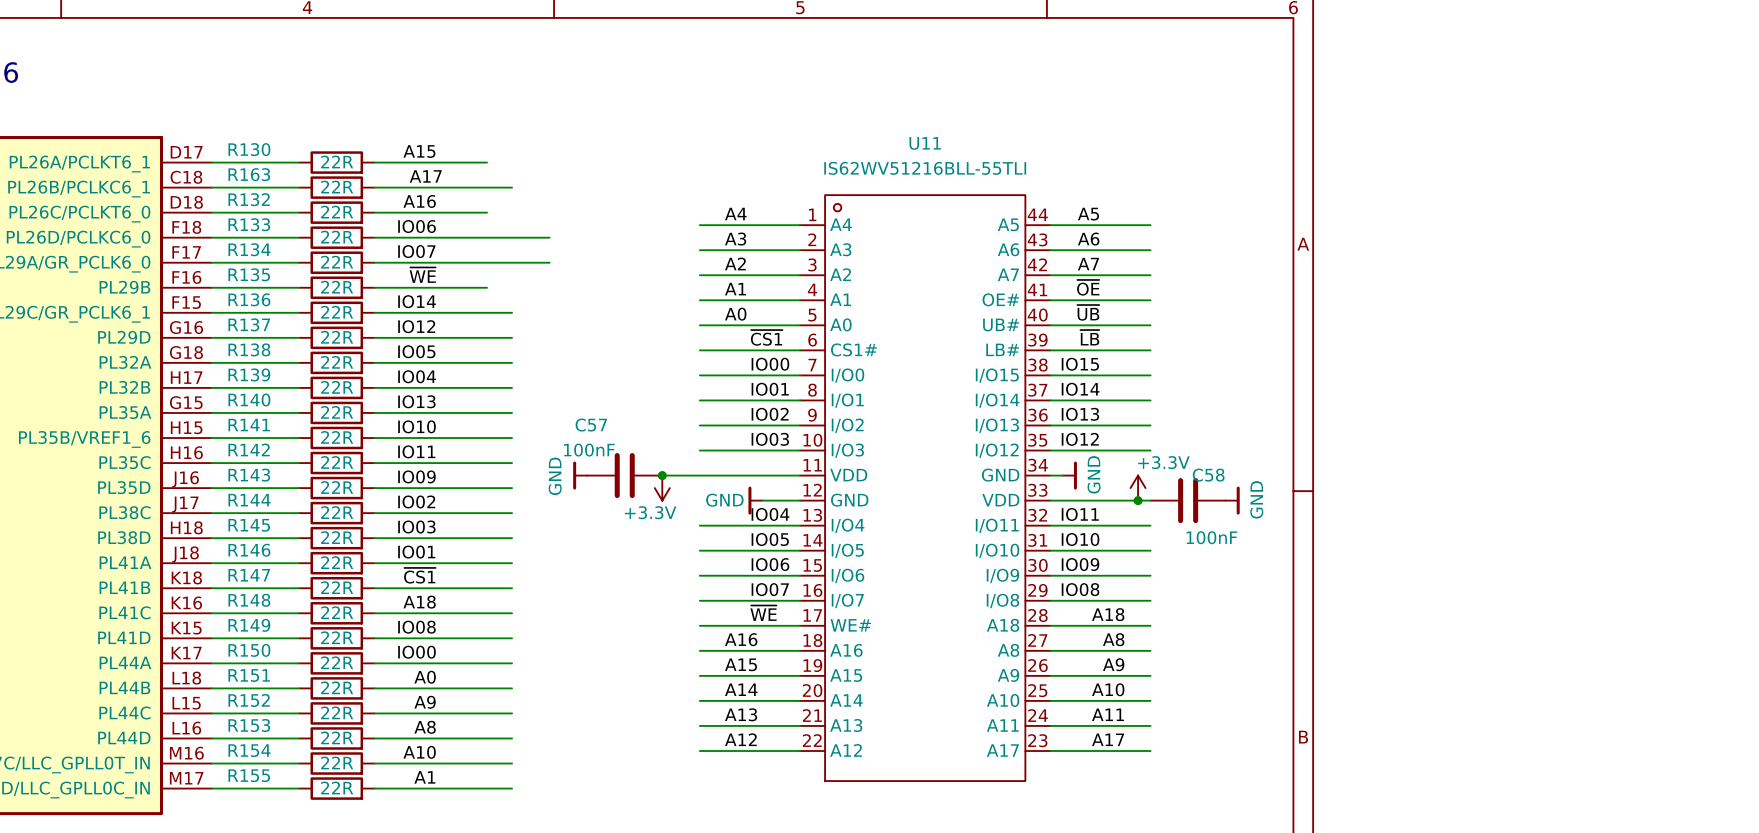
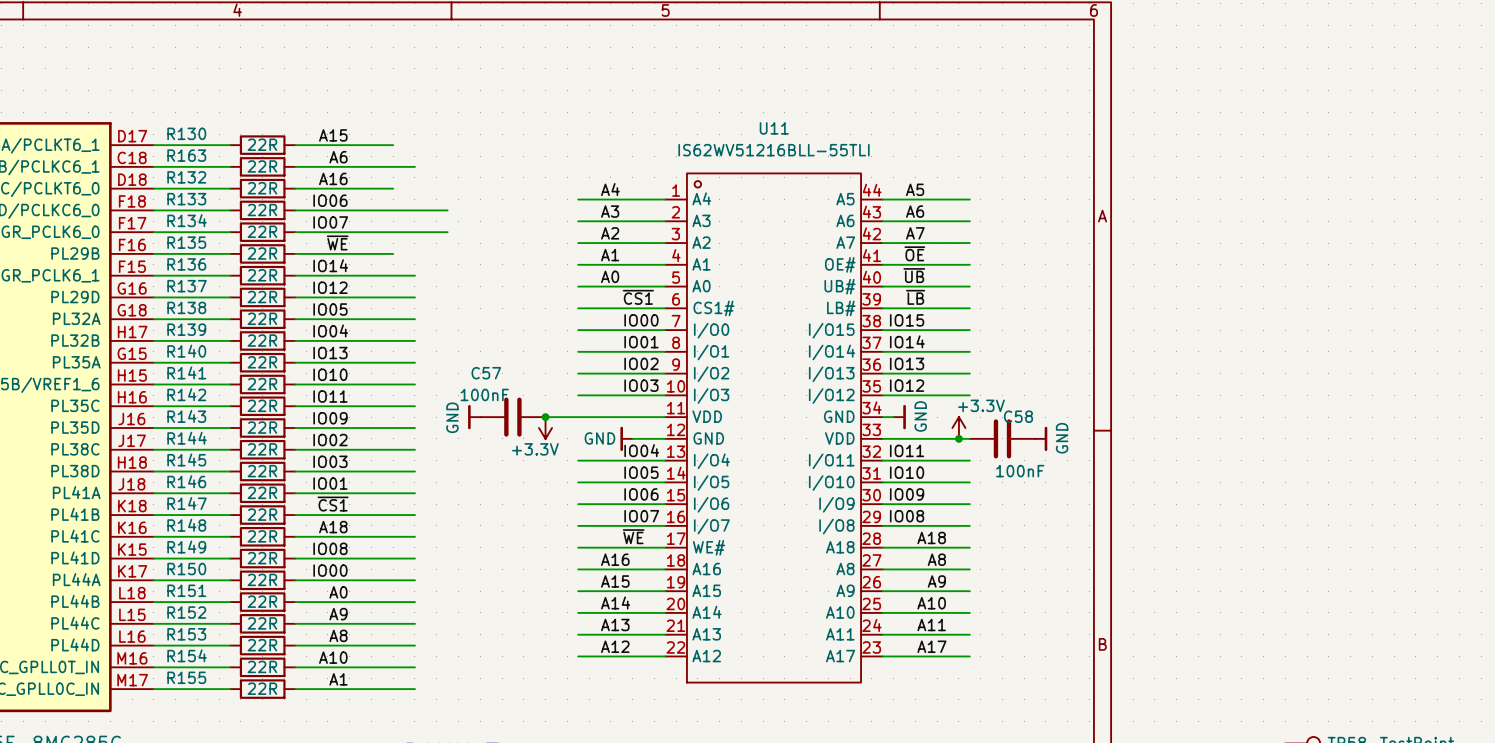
label: A17 (425, 176) -> A6 (338, 157)

